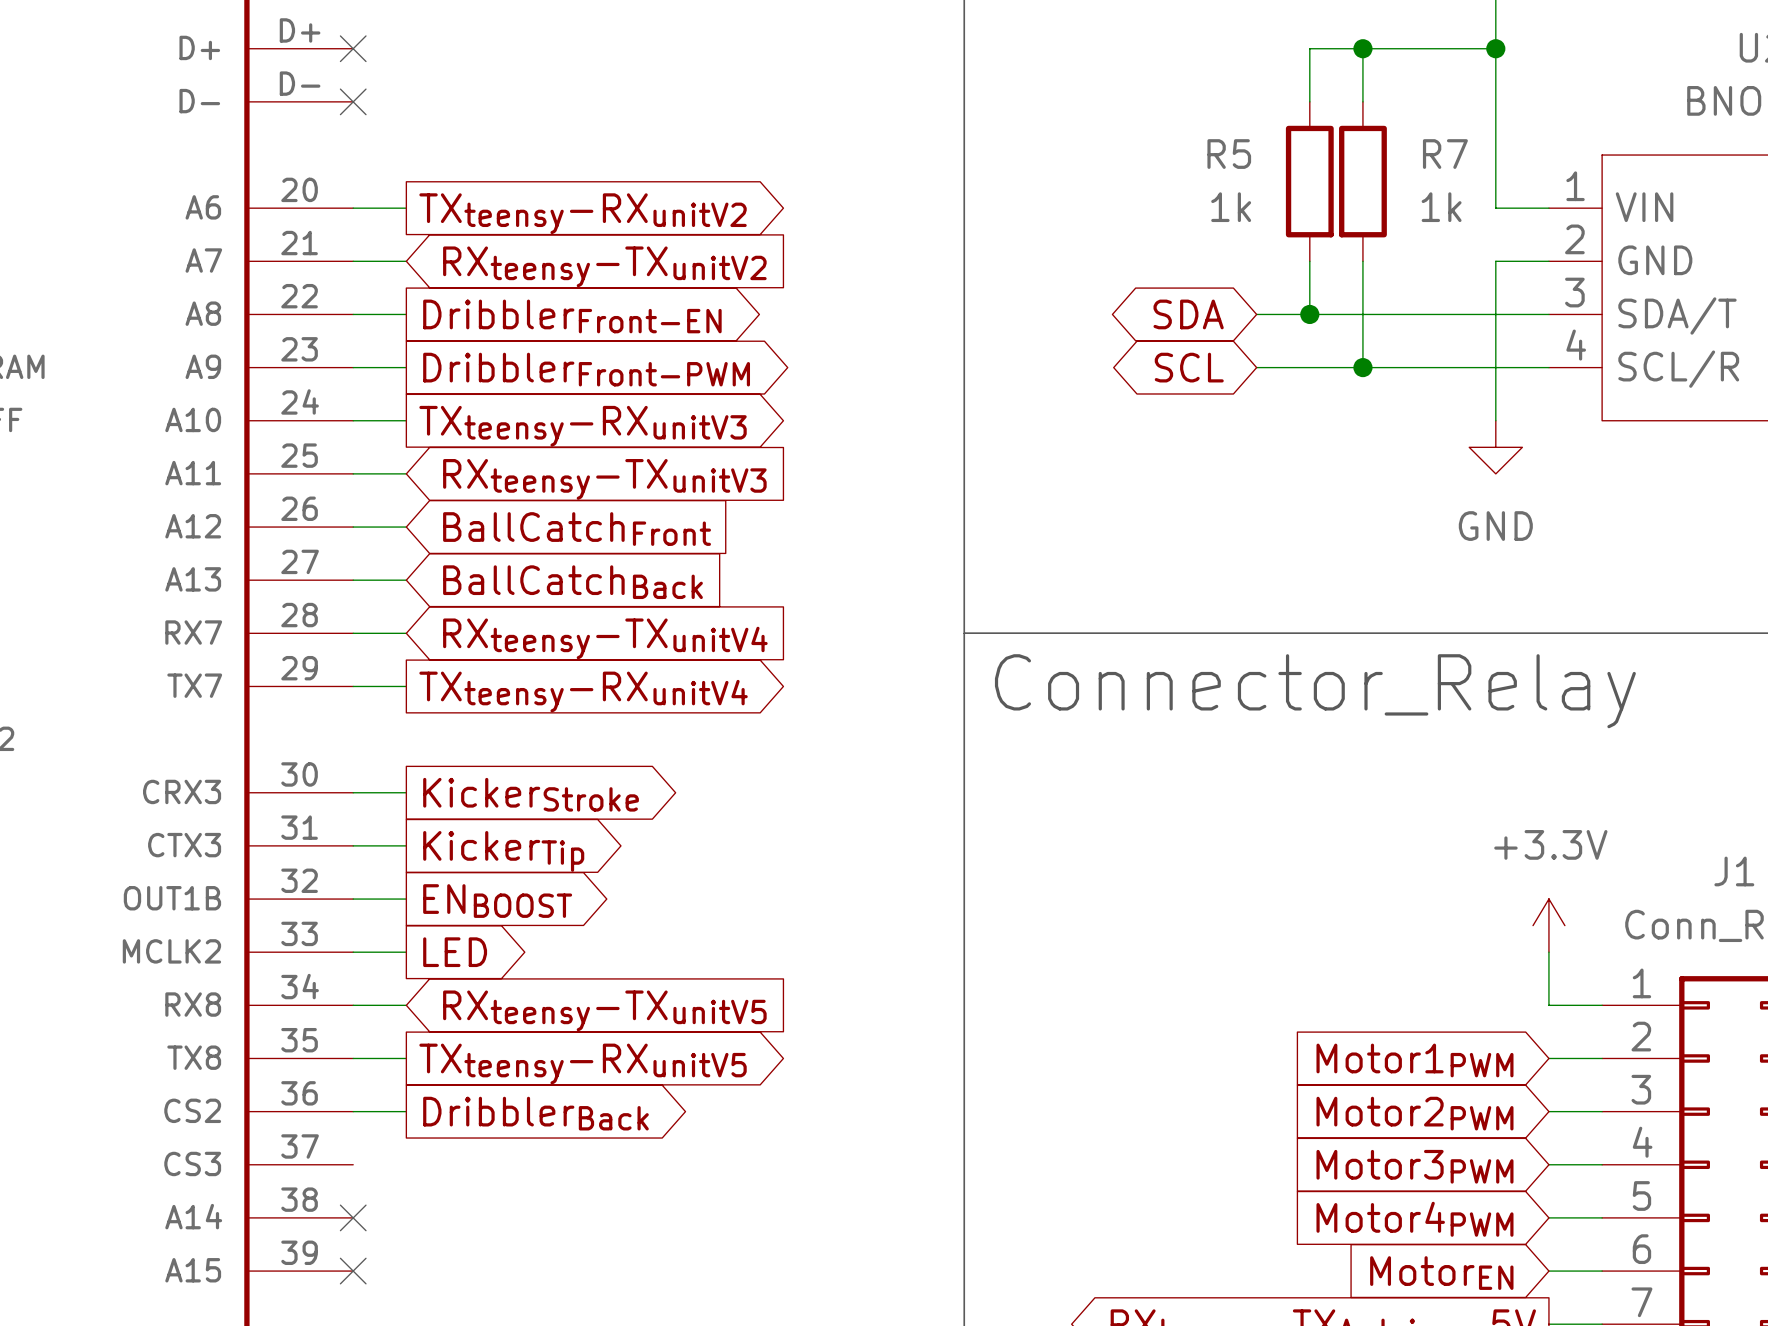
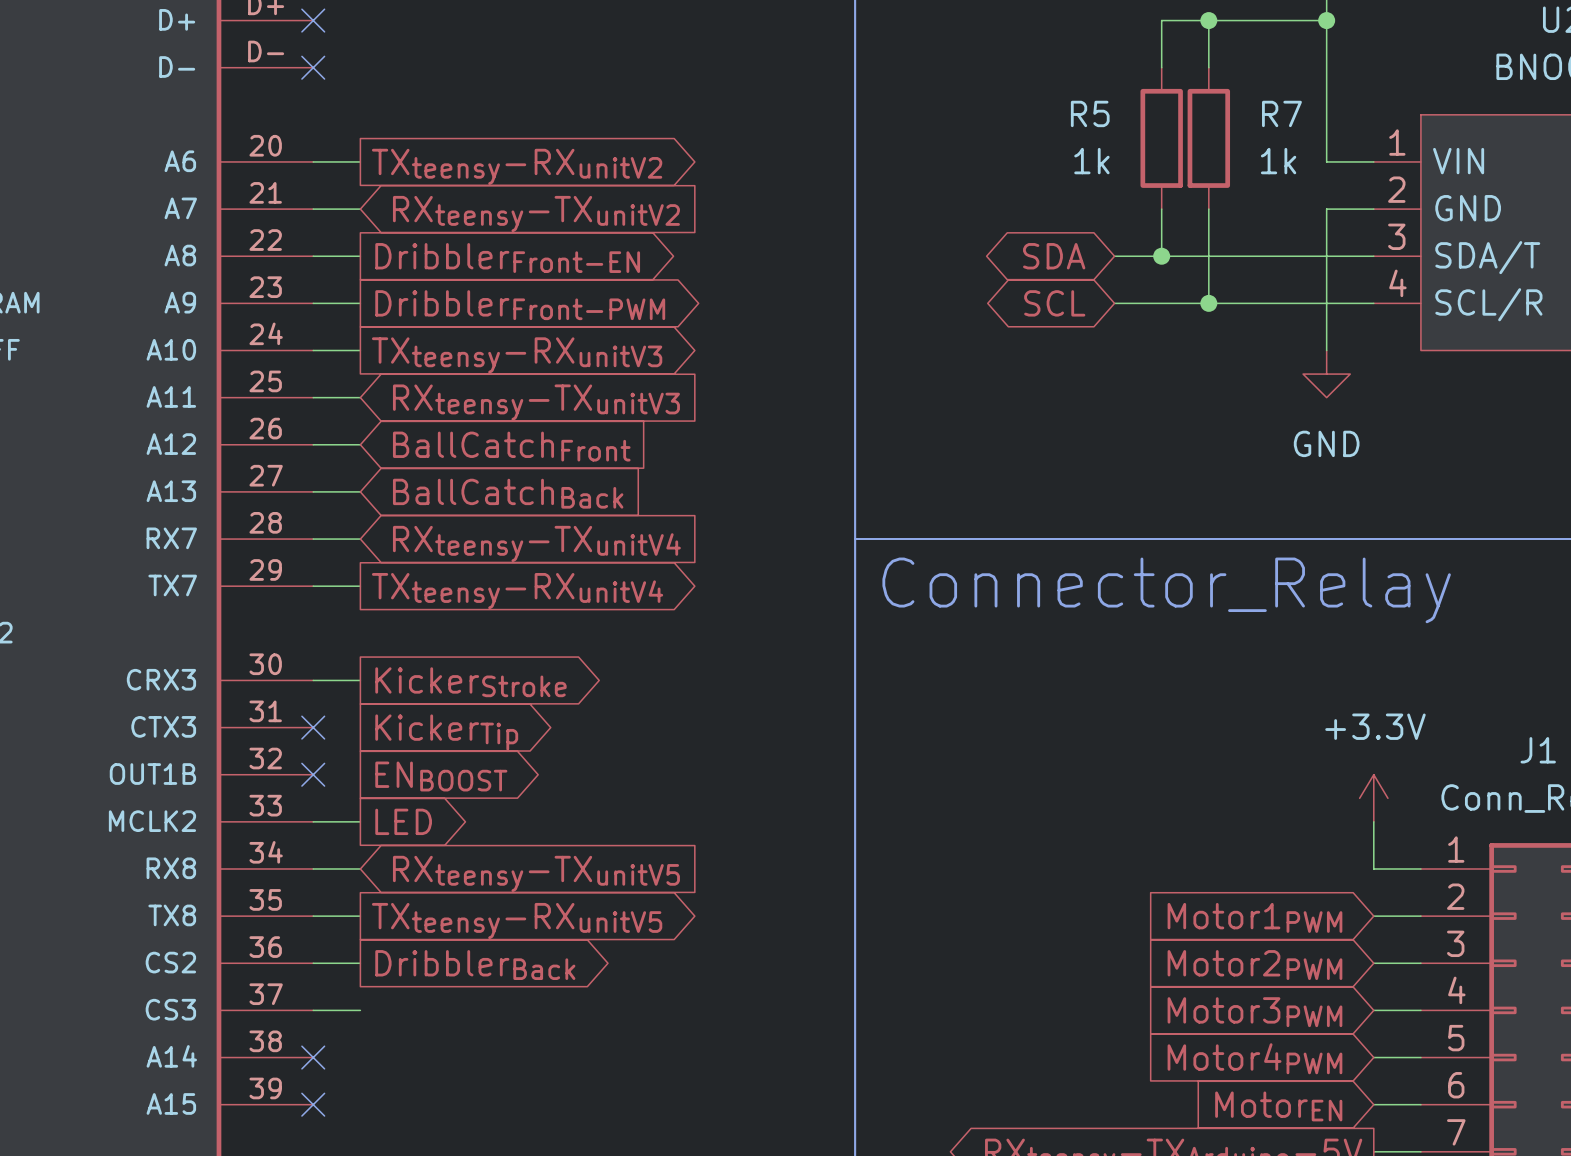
wire: (353, 845) (406, 845) -> none
no-connect mark: none -> (313, 727)
wire: (353, 899) (406, 899) -> (313, 1010) (360, 1010)
no-connect mark: none -> (313, 774)

